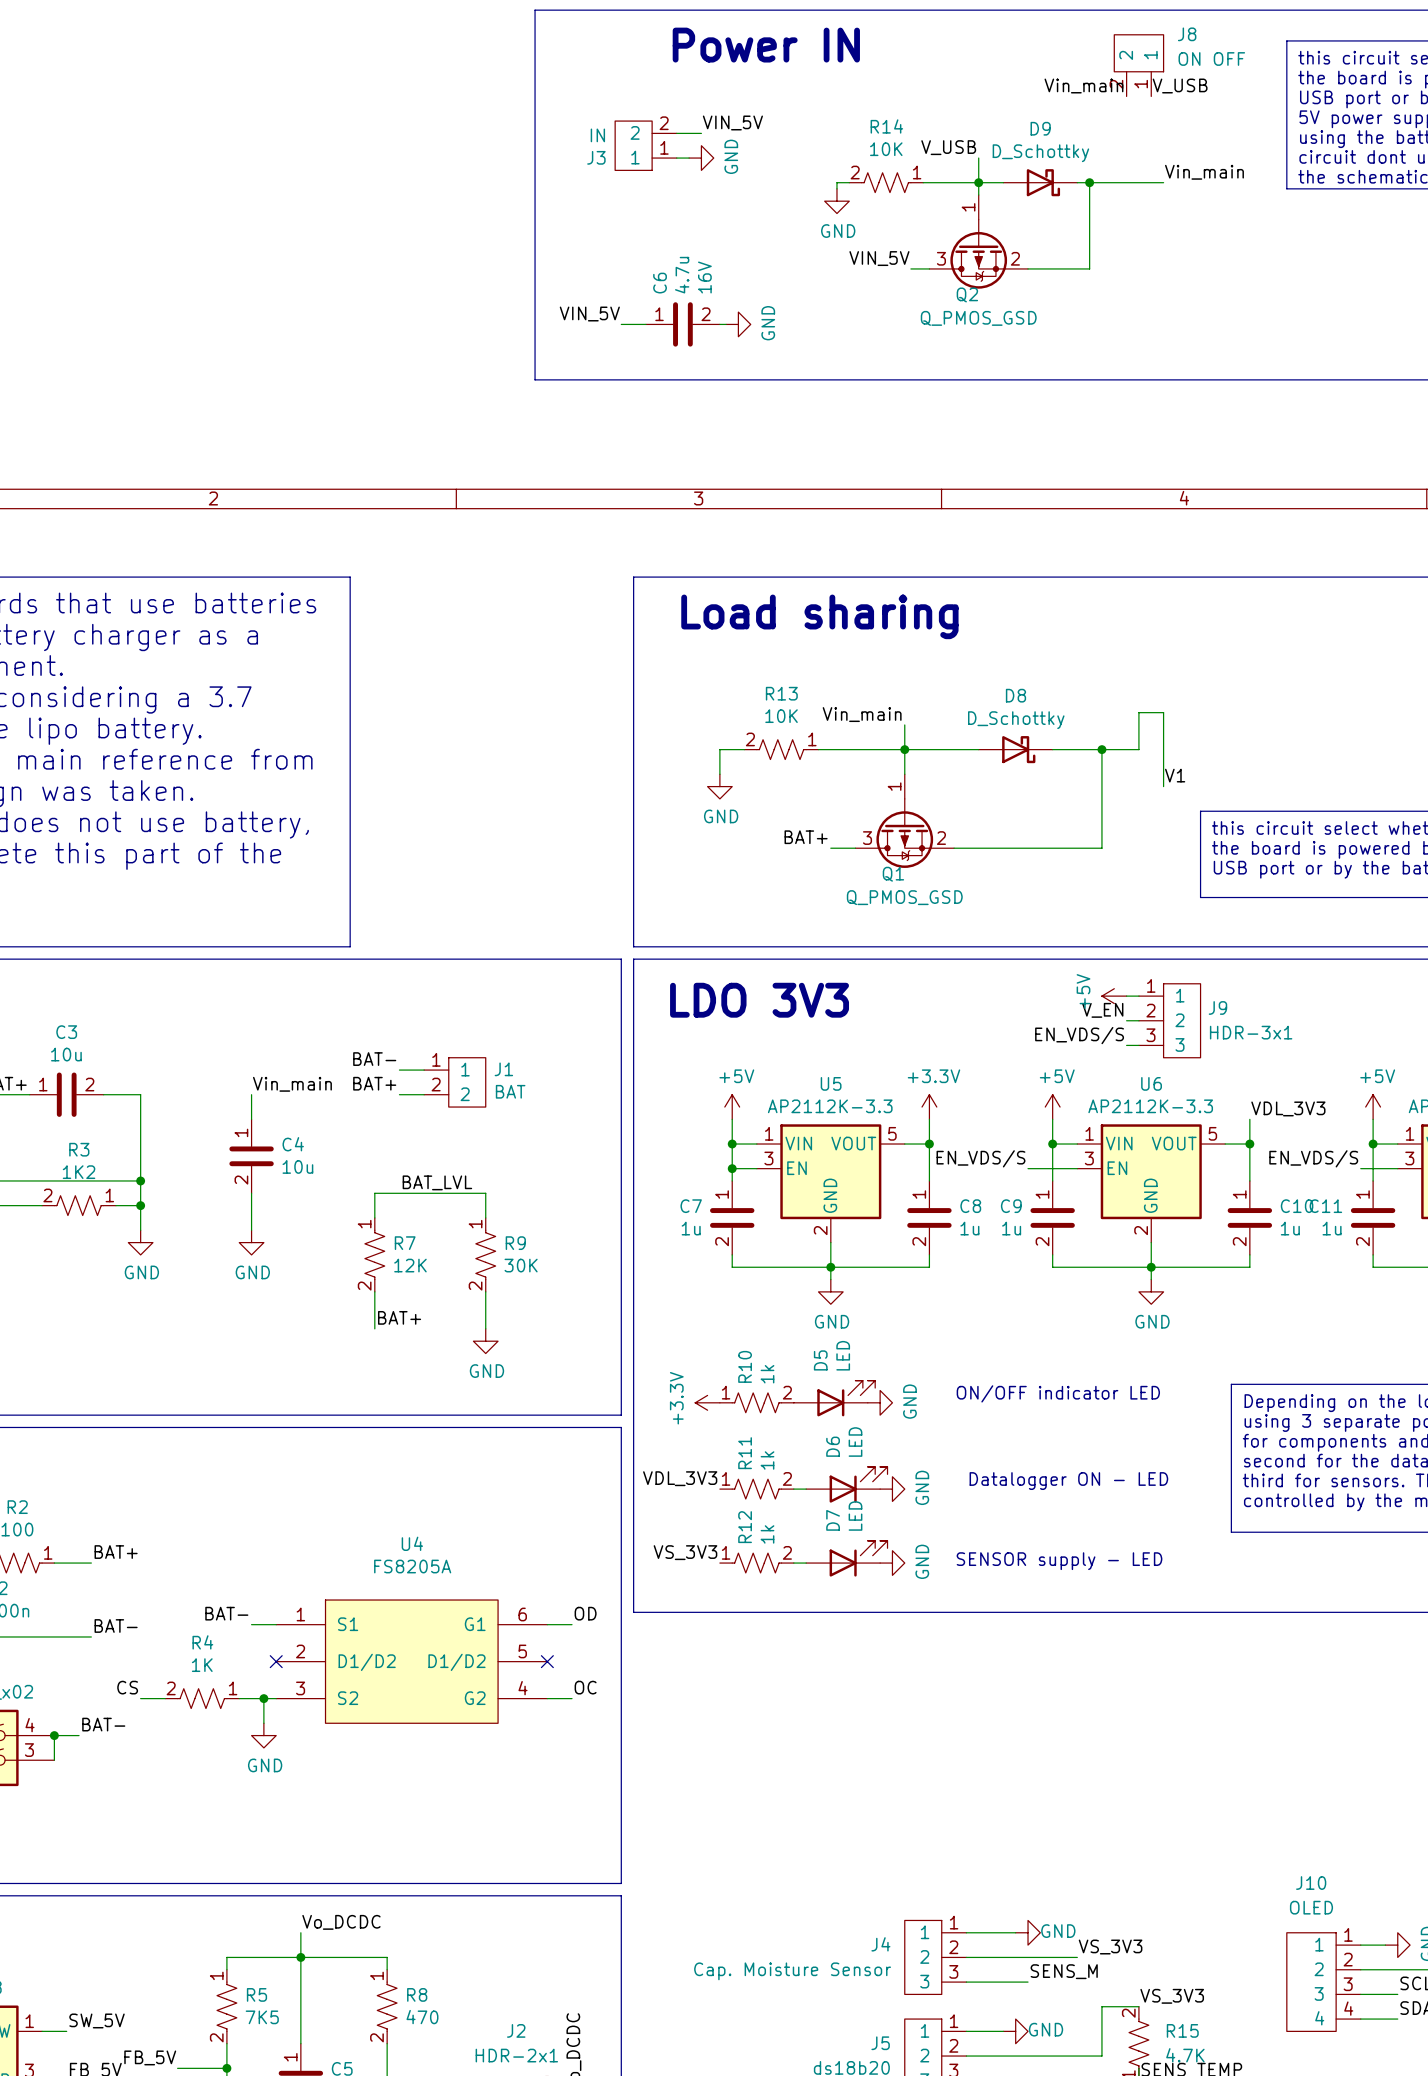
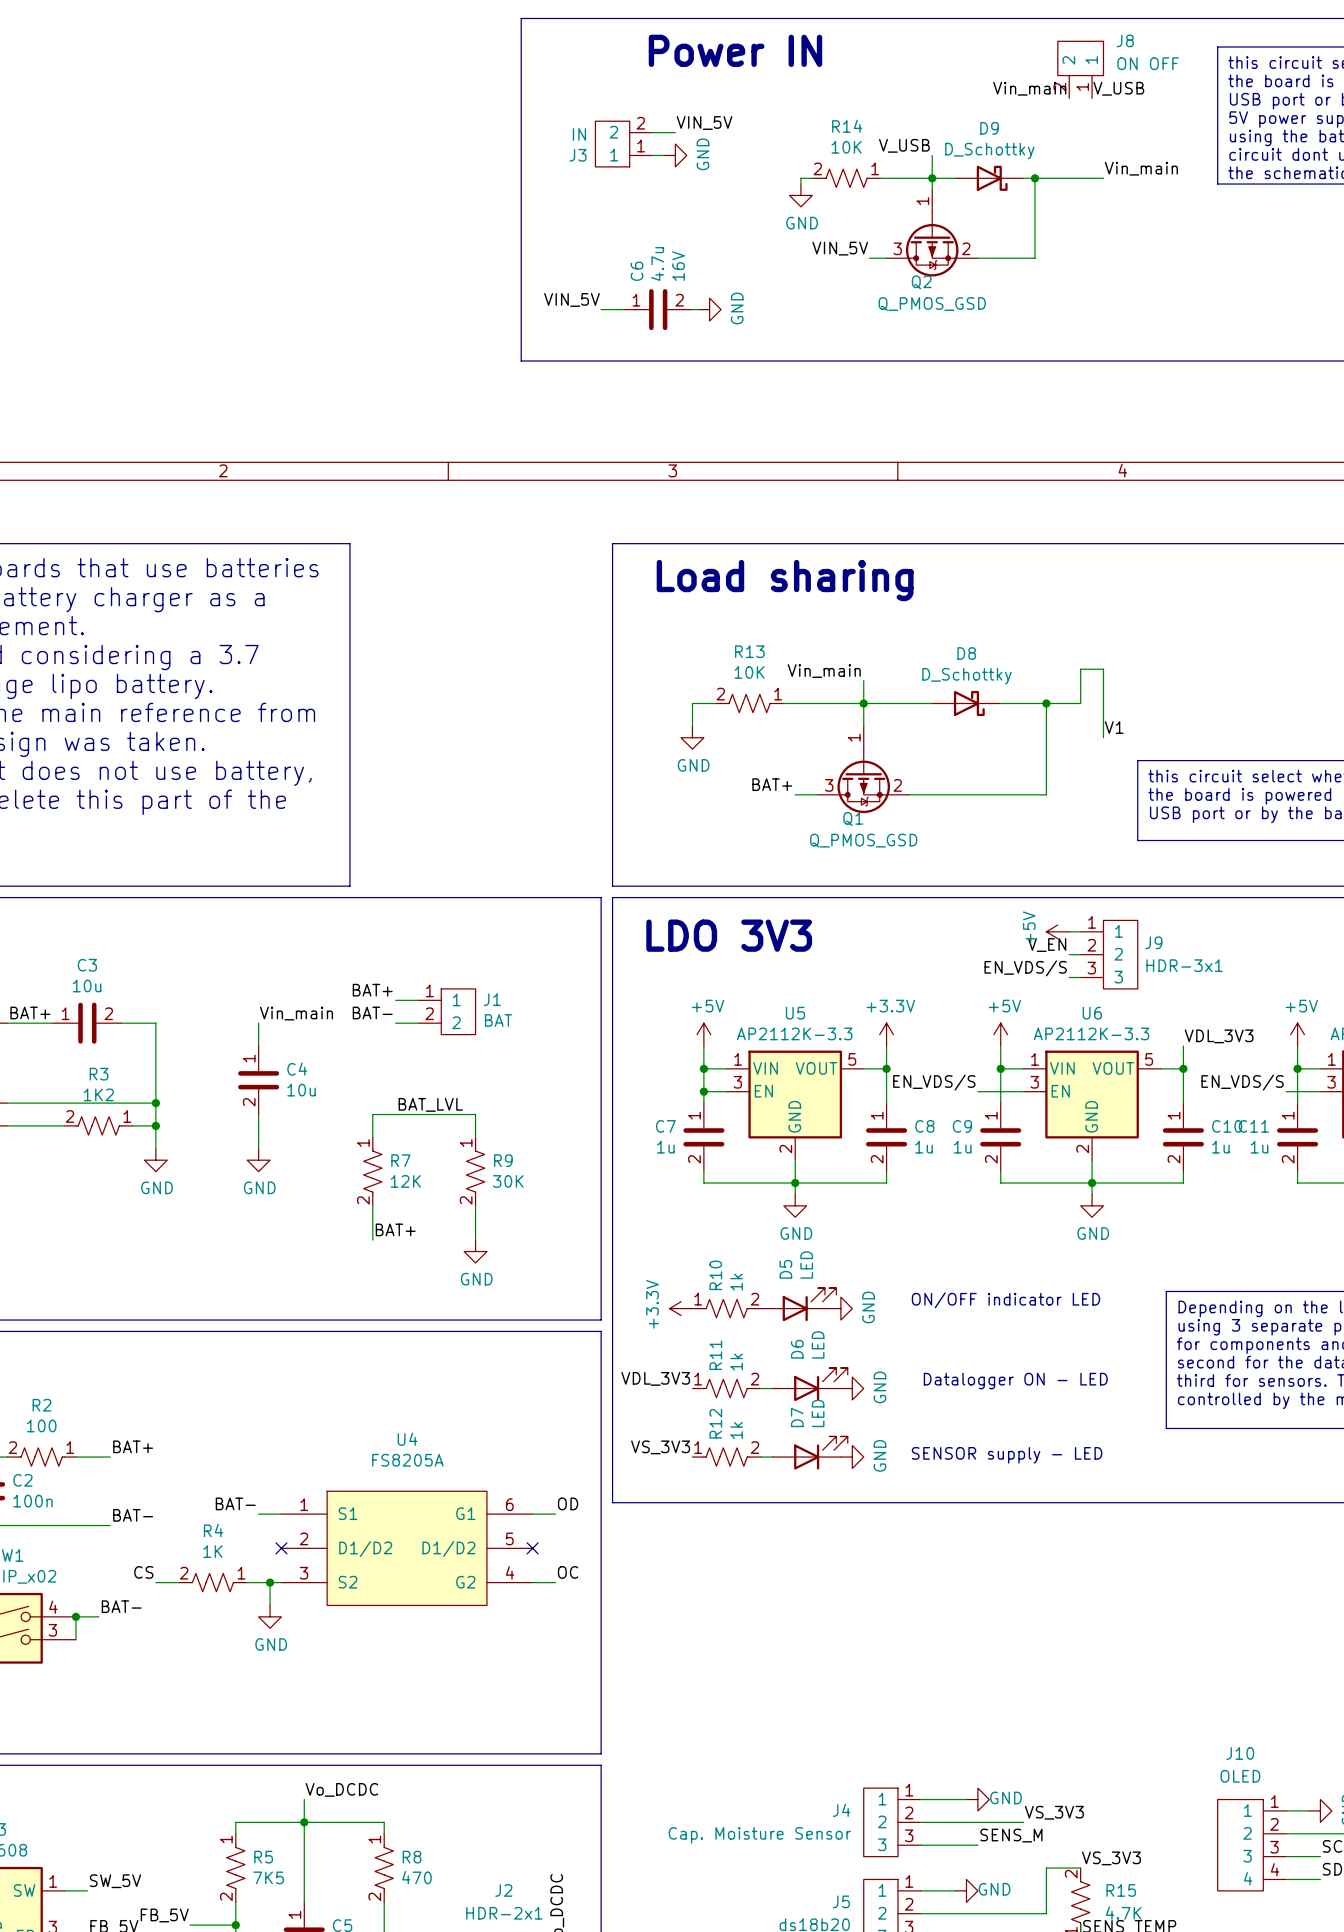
label: BAT- (374, 1059) -> BAT+ (372, 990)
label: BAT+ (374, 1083) -> BAT- (372, 1012)

